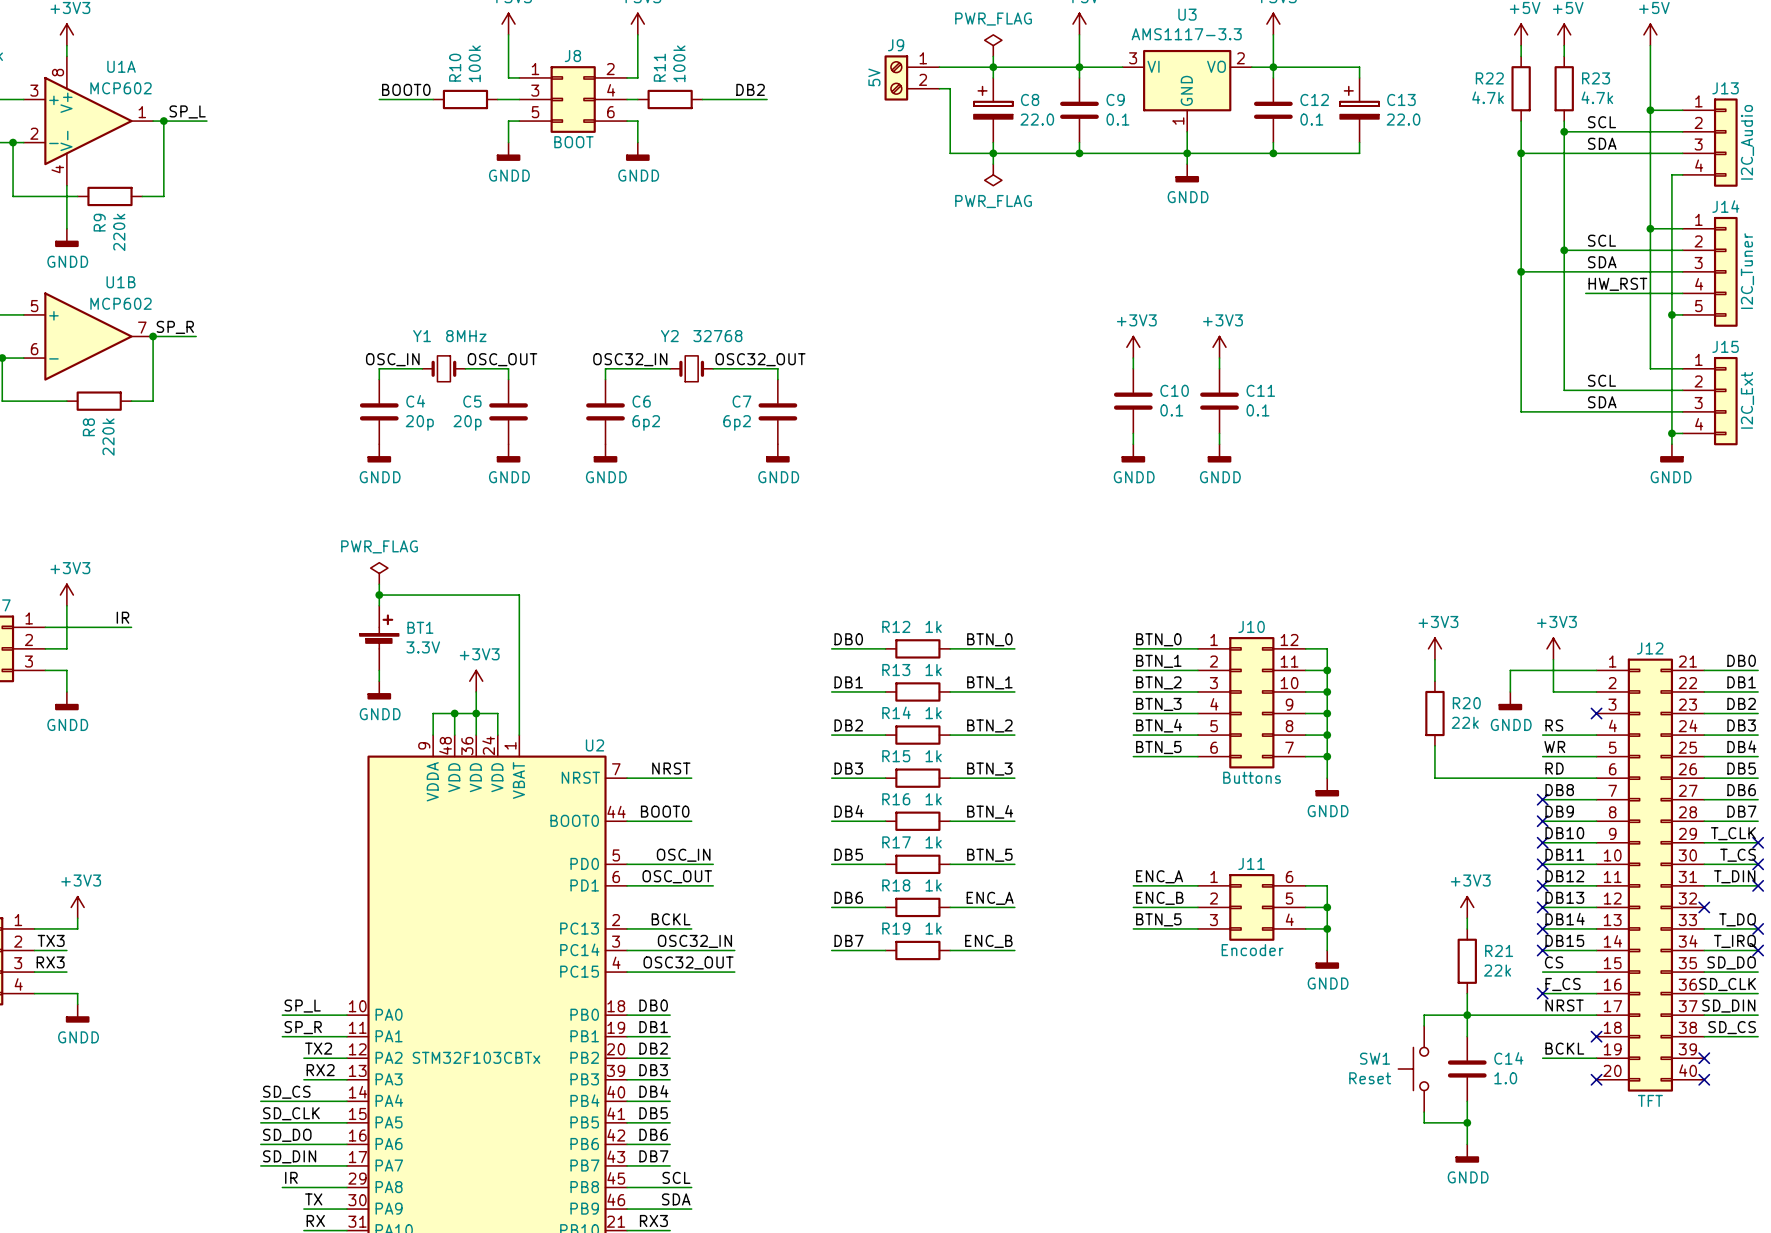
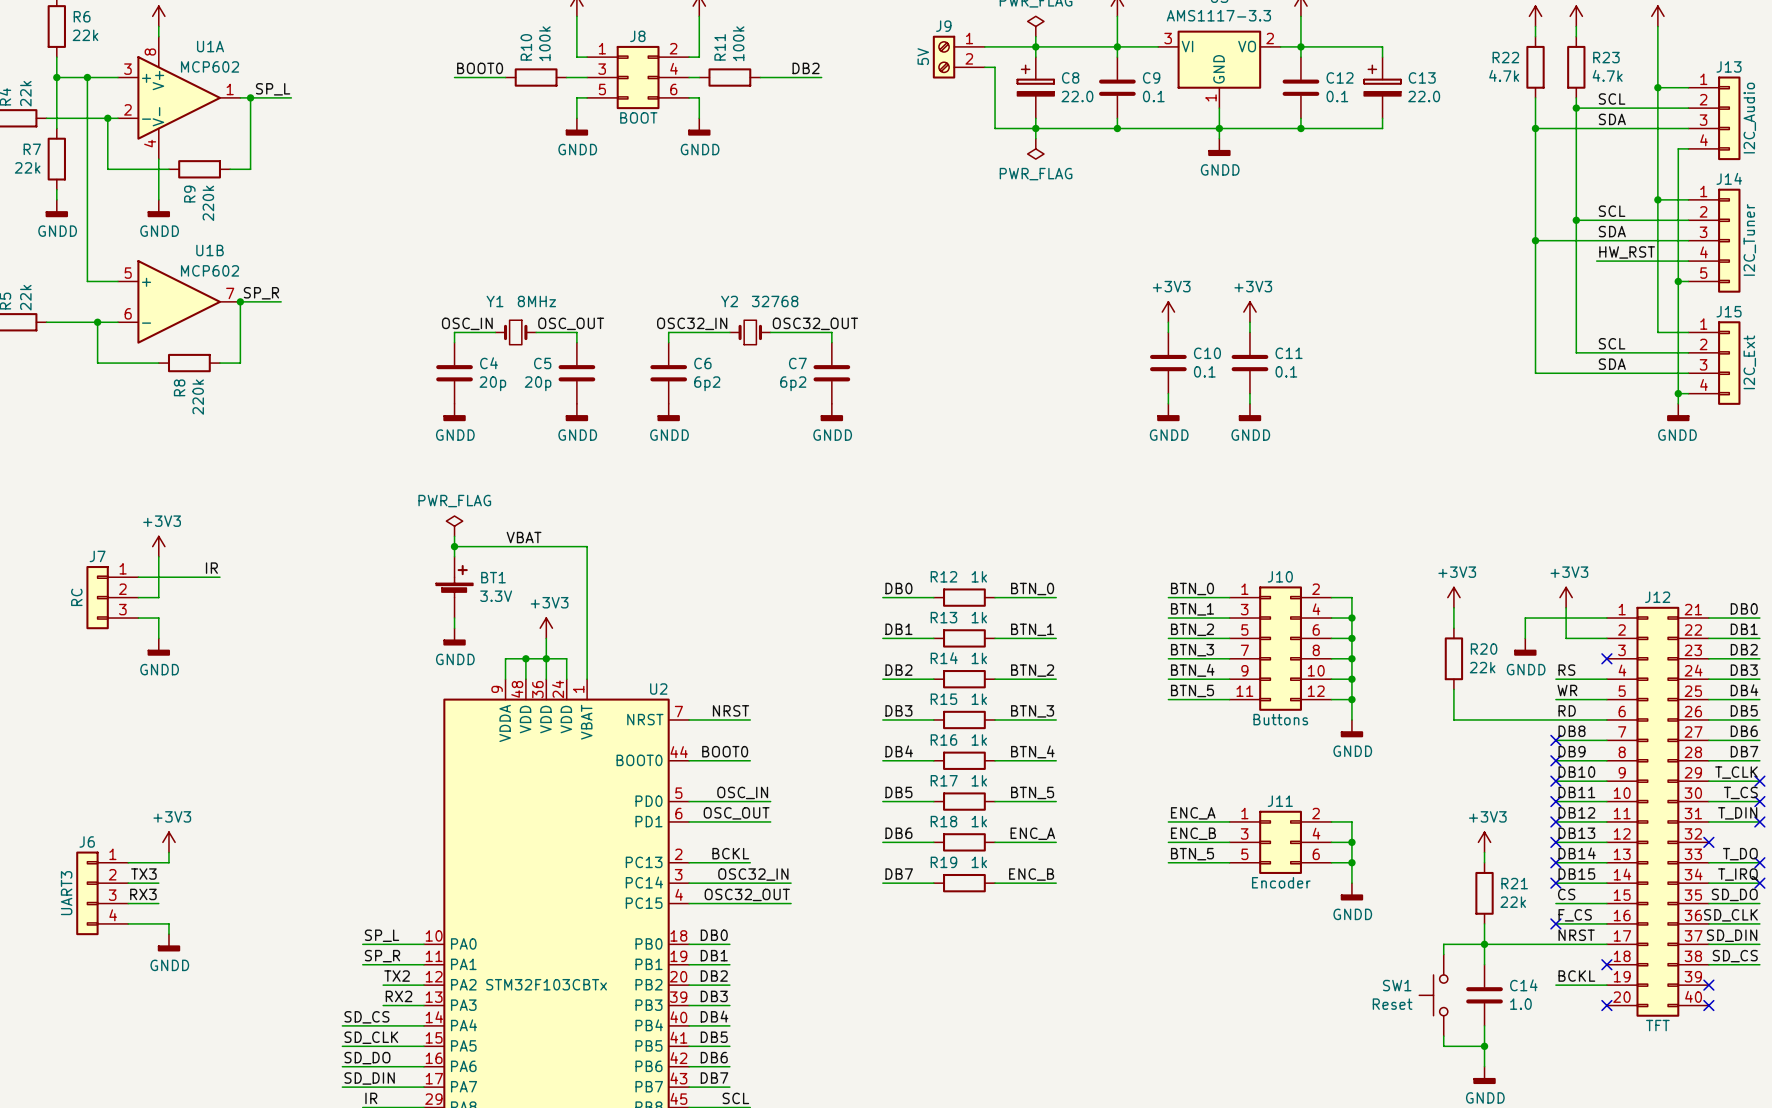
label: none -> VBAT (524, 537)
J10 symbol: [1197, 637, 1306, 769] -> [1229, 586, 1332, 711]
J11 pin number: 6 (1289, 876) -> 2 (1316, 813)
J11 pin number: 2 (1213, 898) -> 3 (1244, 833)
J11 pin number: 5 (1289, 898) -> 4 (1316, 833)
J11 pin number: 4 (1289, 919) -> 6 (1316, 854)
J11 pin number: 3 (1213, 920) -> 5 (1244, 854)

